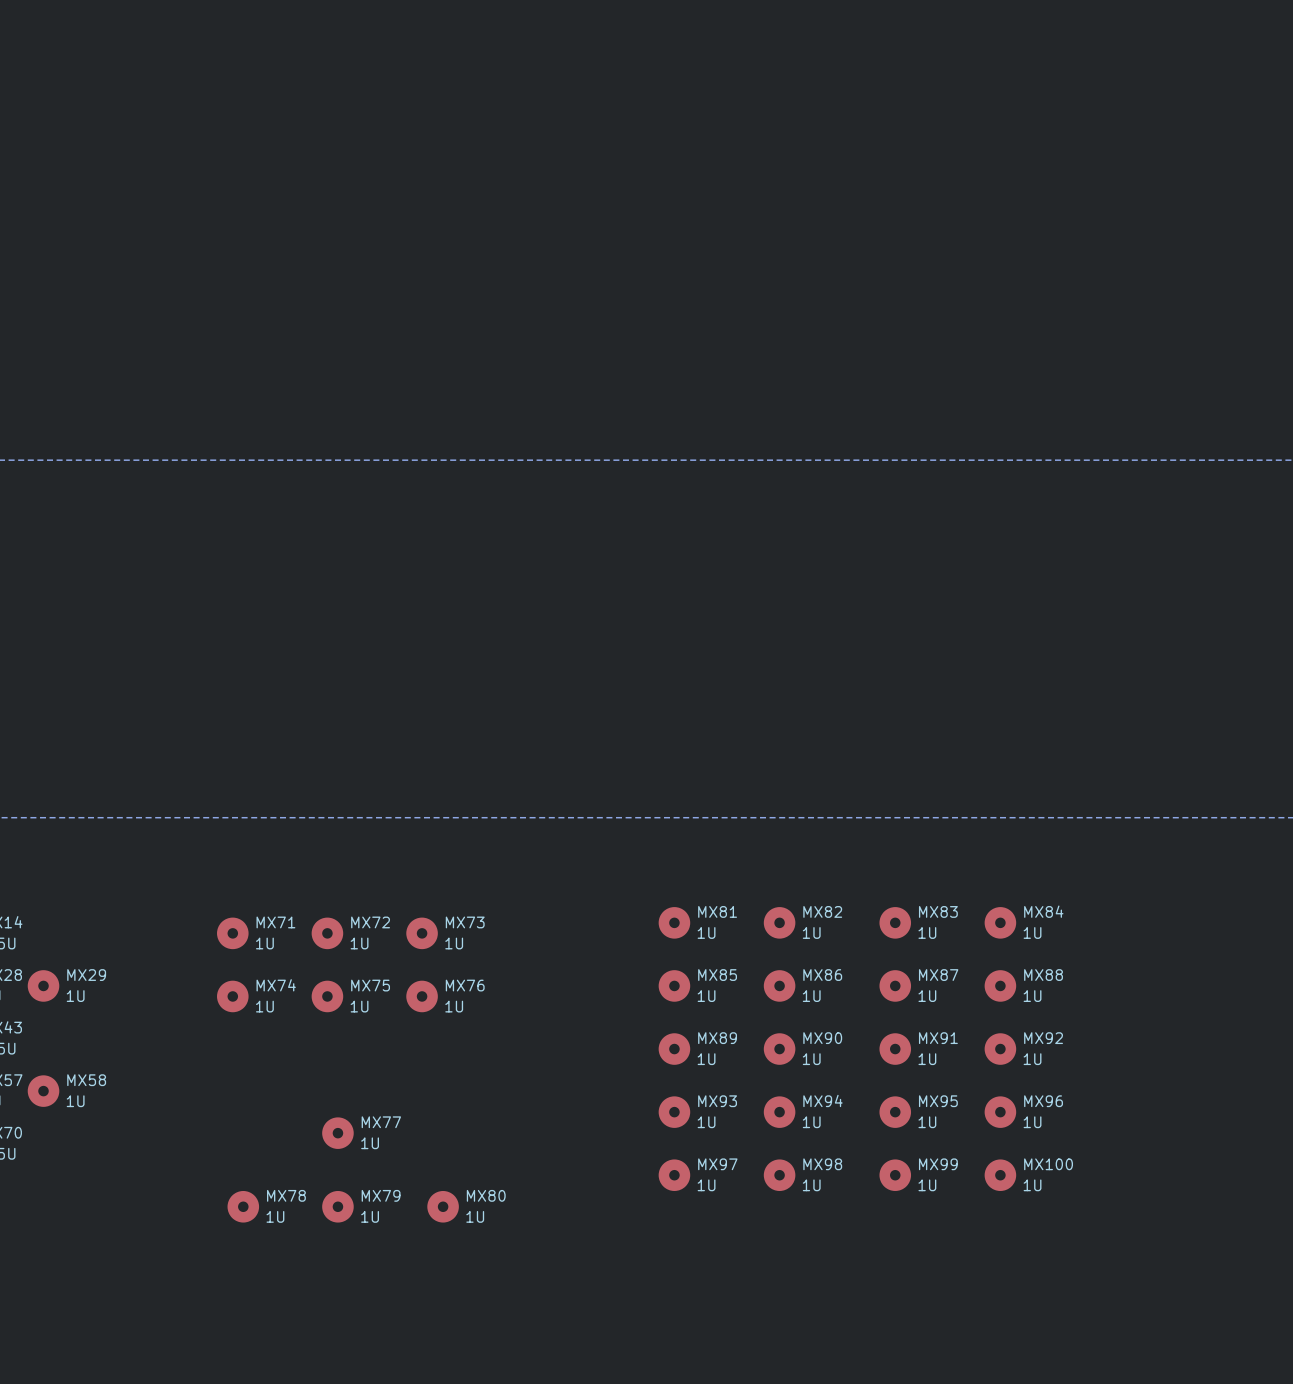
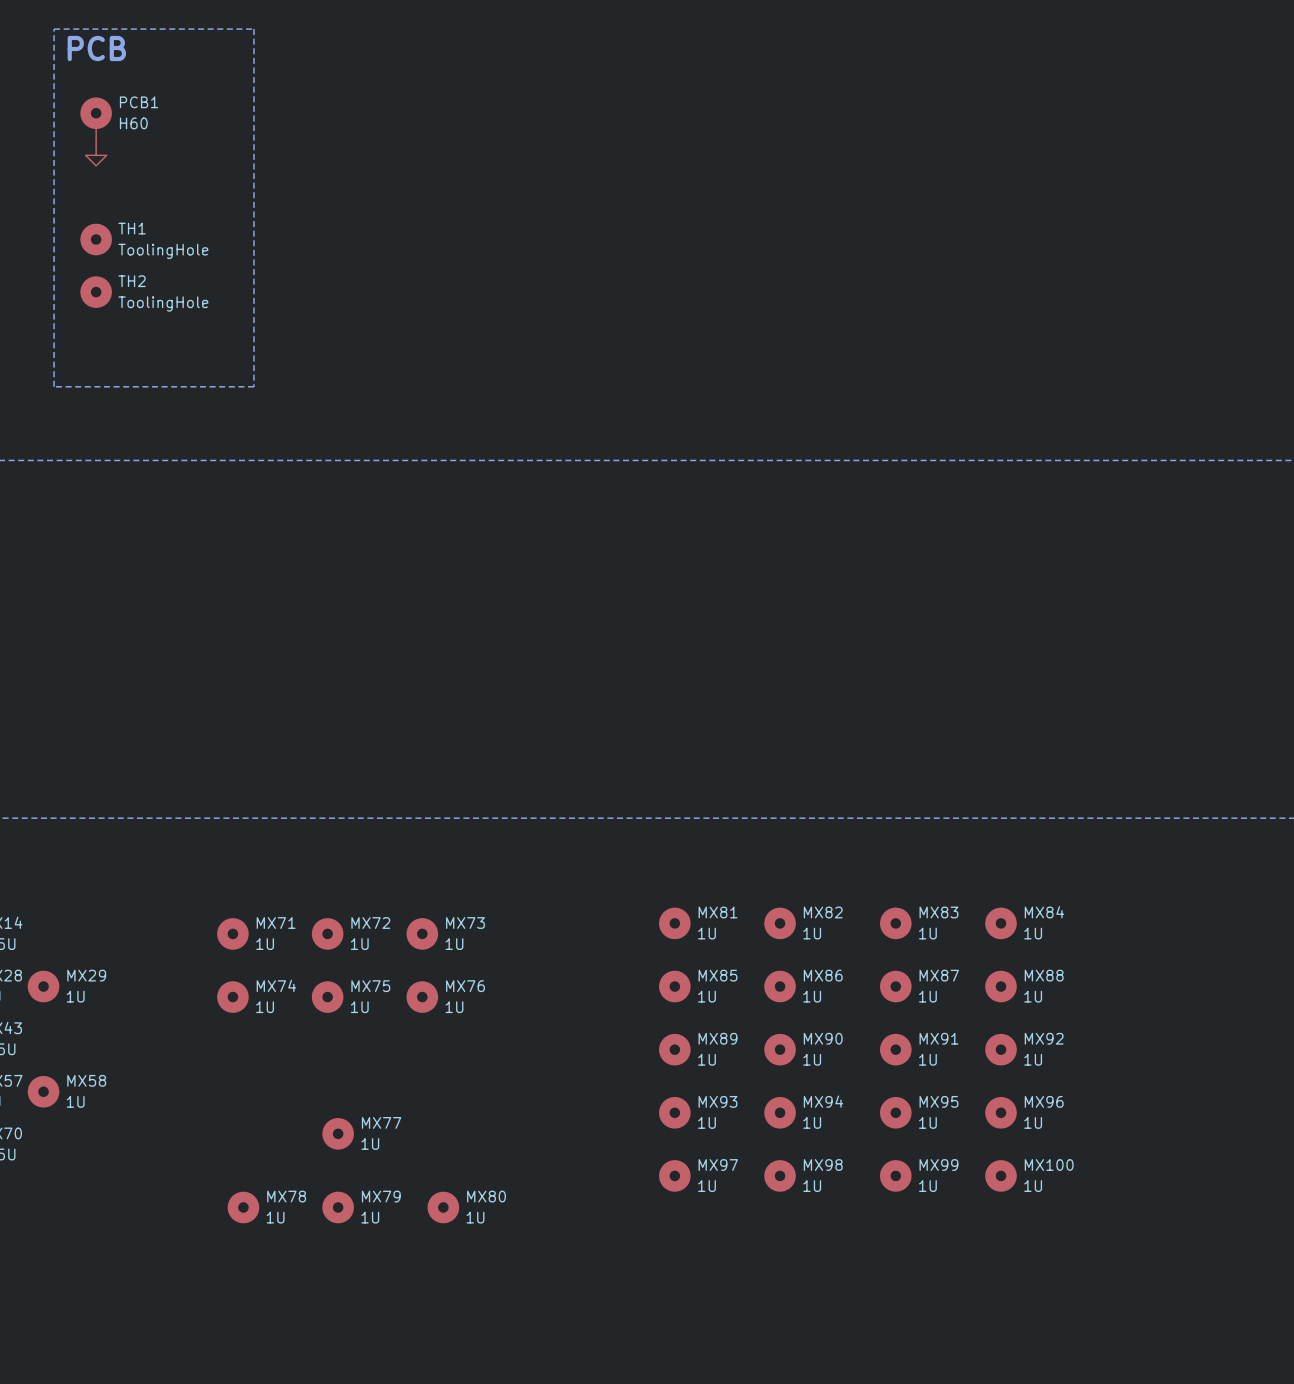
line: none -> (54, 29) (253, 29) (253, 386) (54, 386) (54, 29)
text: none -> PCB (96, 48)
PCB1: none -> H60 (96, 121)
power symbol: none -> (96, 155)
TH1: none -> ToolingHole (96, 239)
TH2: none -> ToolingHole (96, 292)

